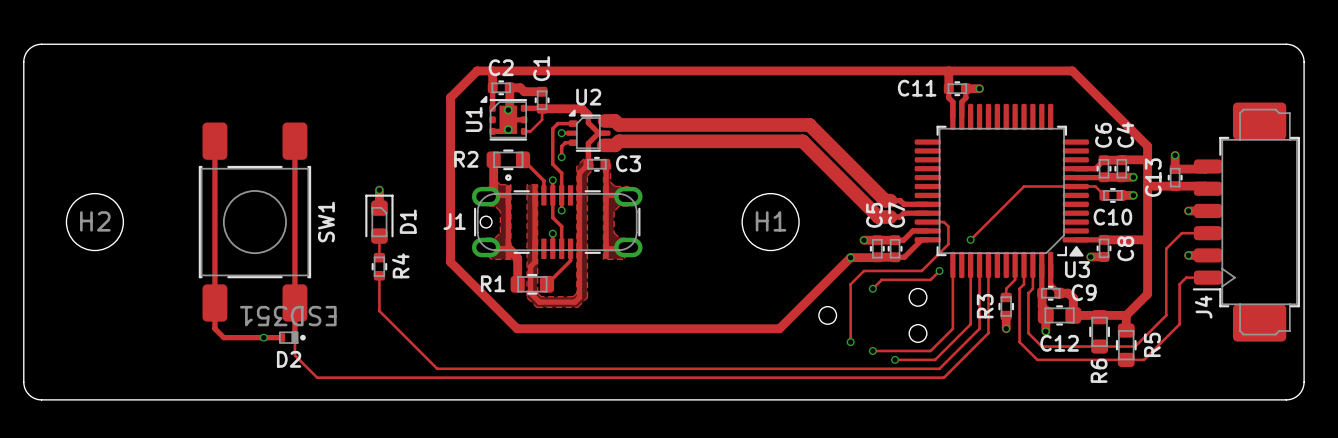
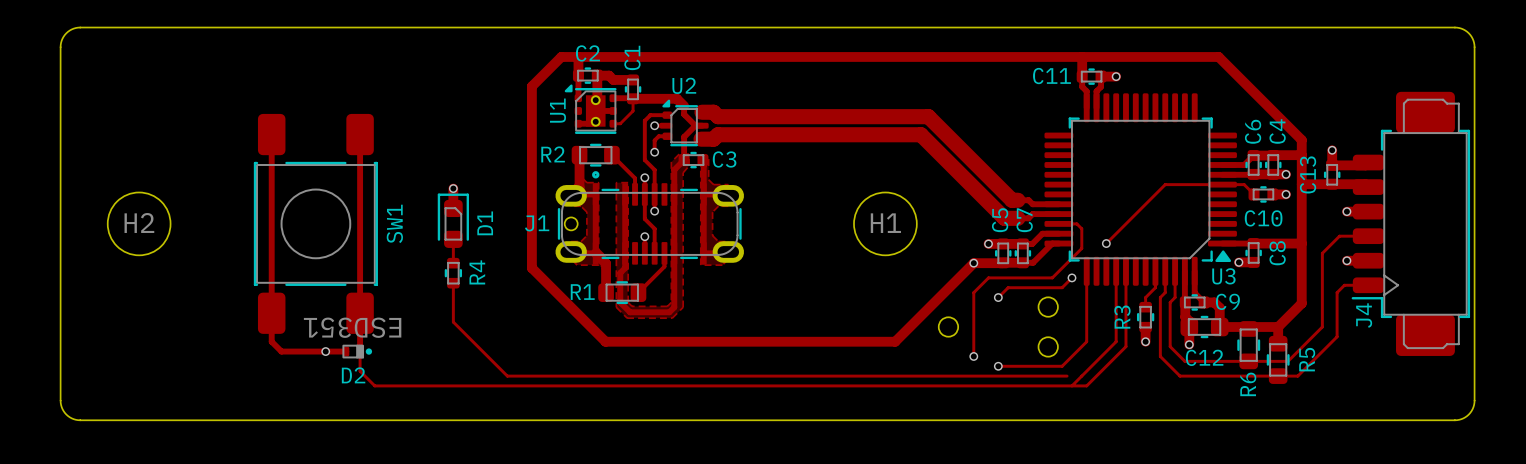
track: (970, 264) (970, 324) (935, 359) -> none
track: (428, 359) (437, 368) -> (374, 385) (517, 385)
track: none -> (507, 376) (1022, 376)
via: (895, 359) -> none
track: (308, 368) (317, 377) (943, 377) (952, 368) -> (1071, 385) (1086, 385)

